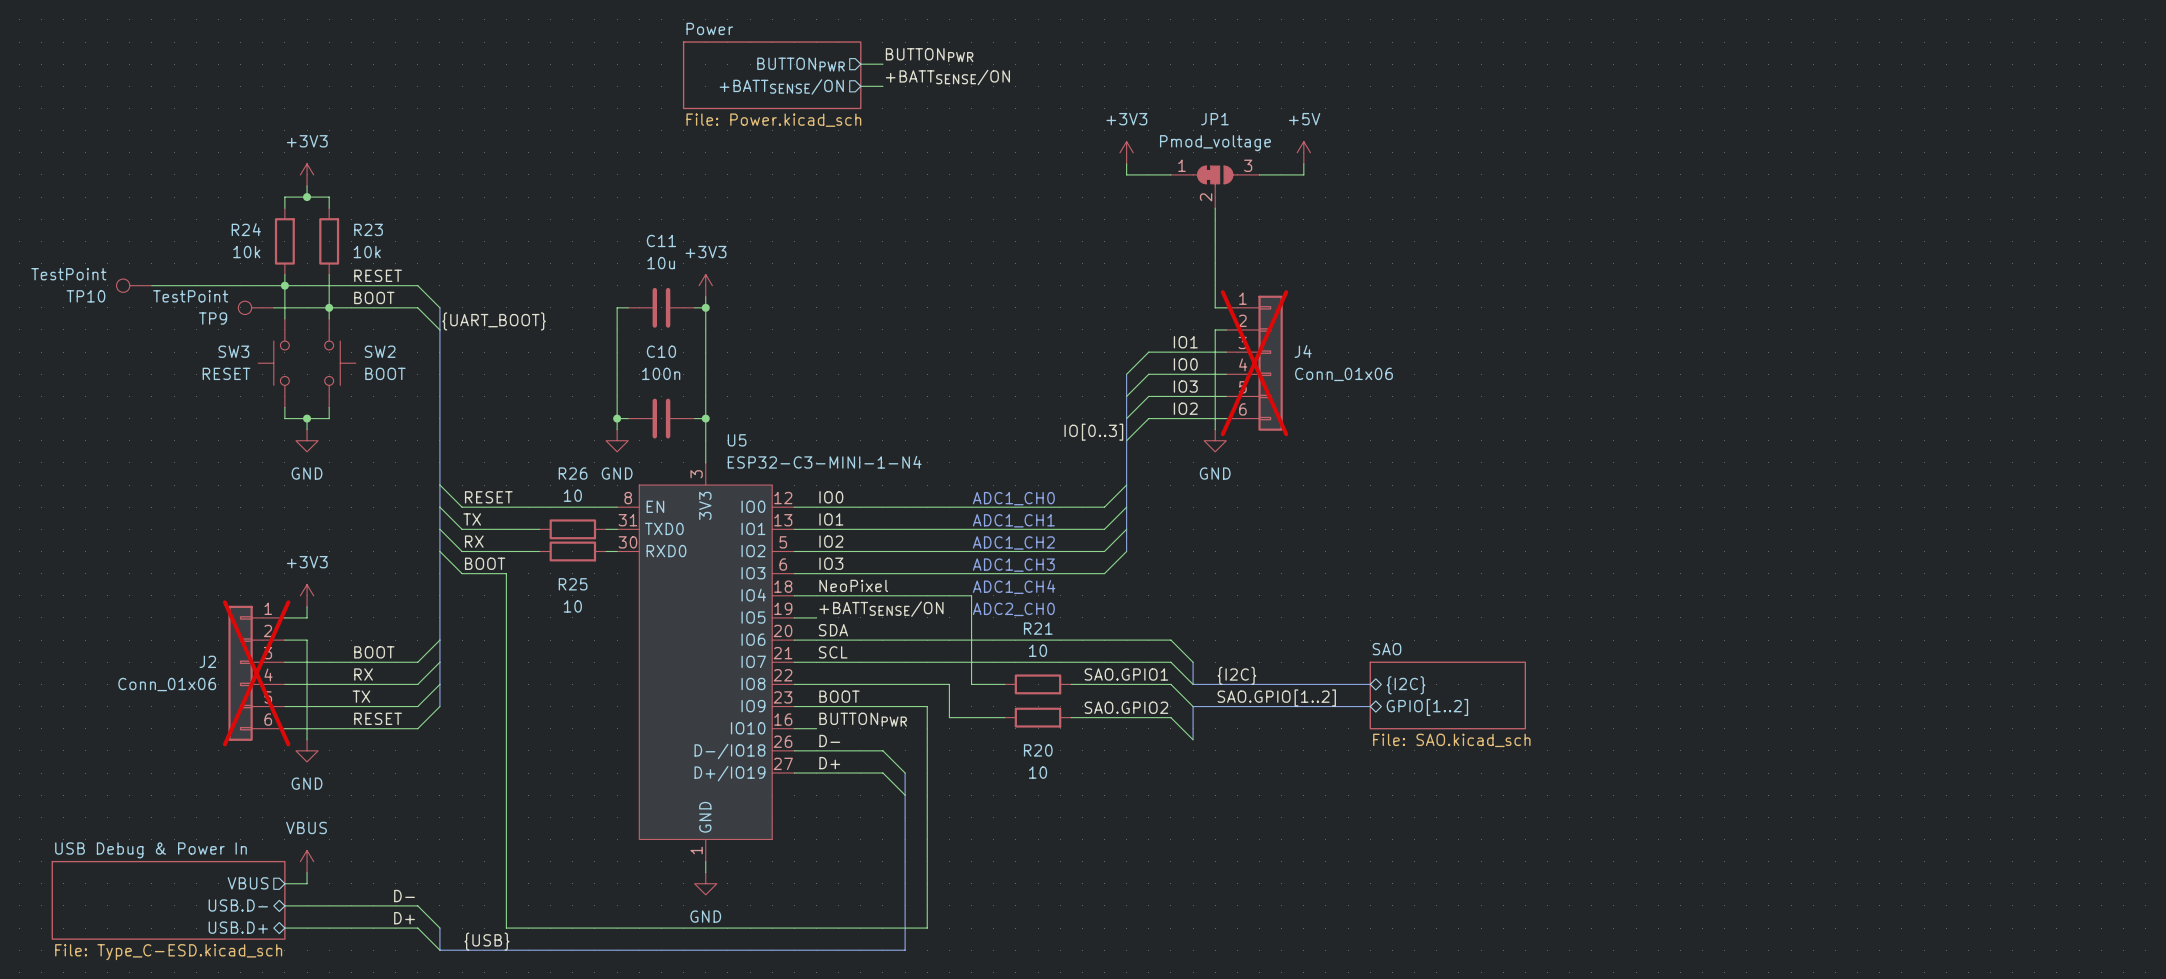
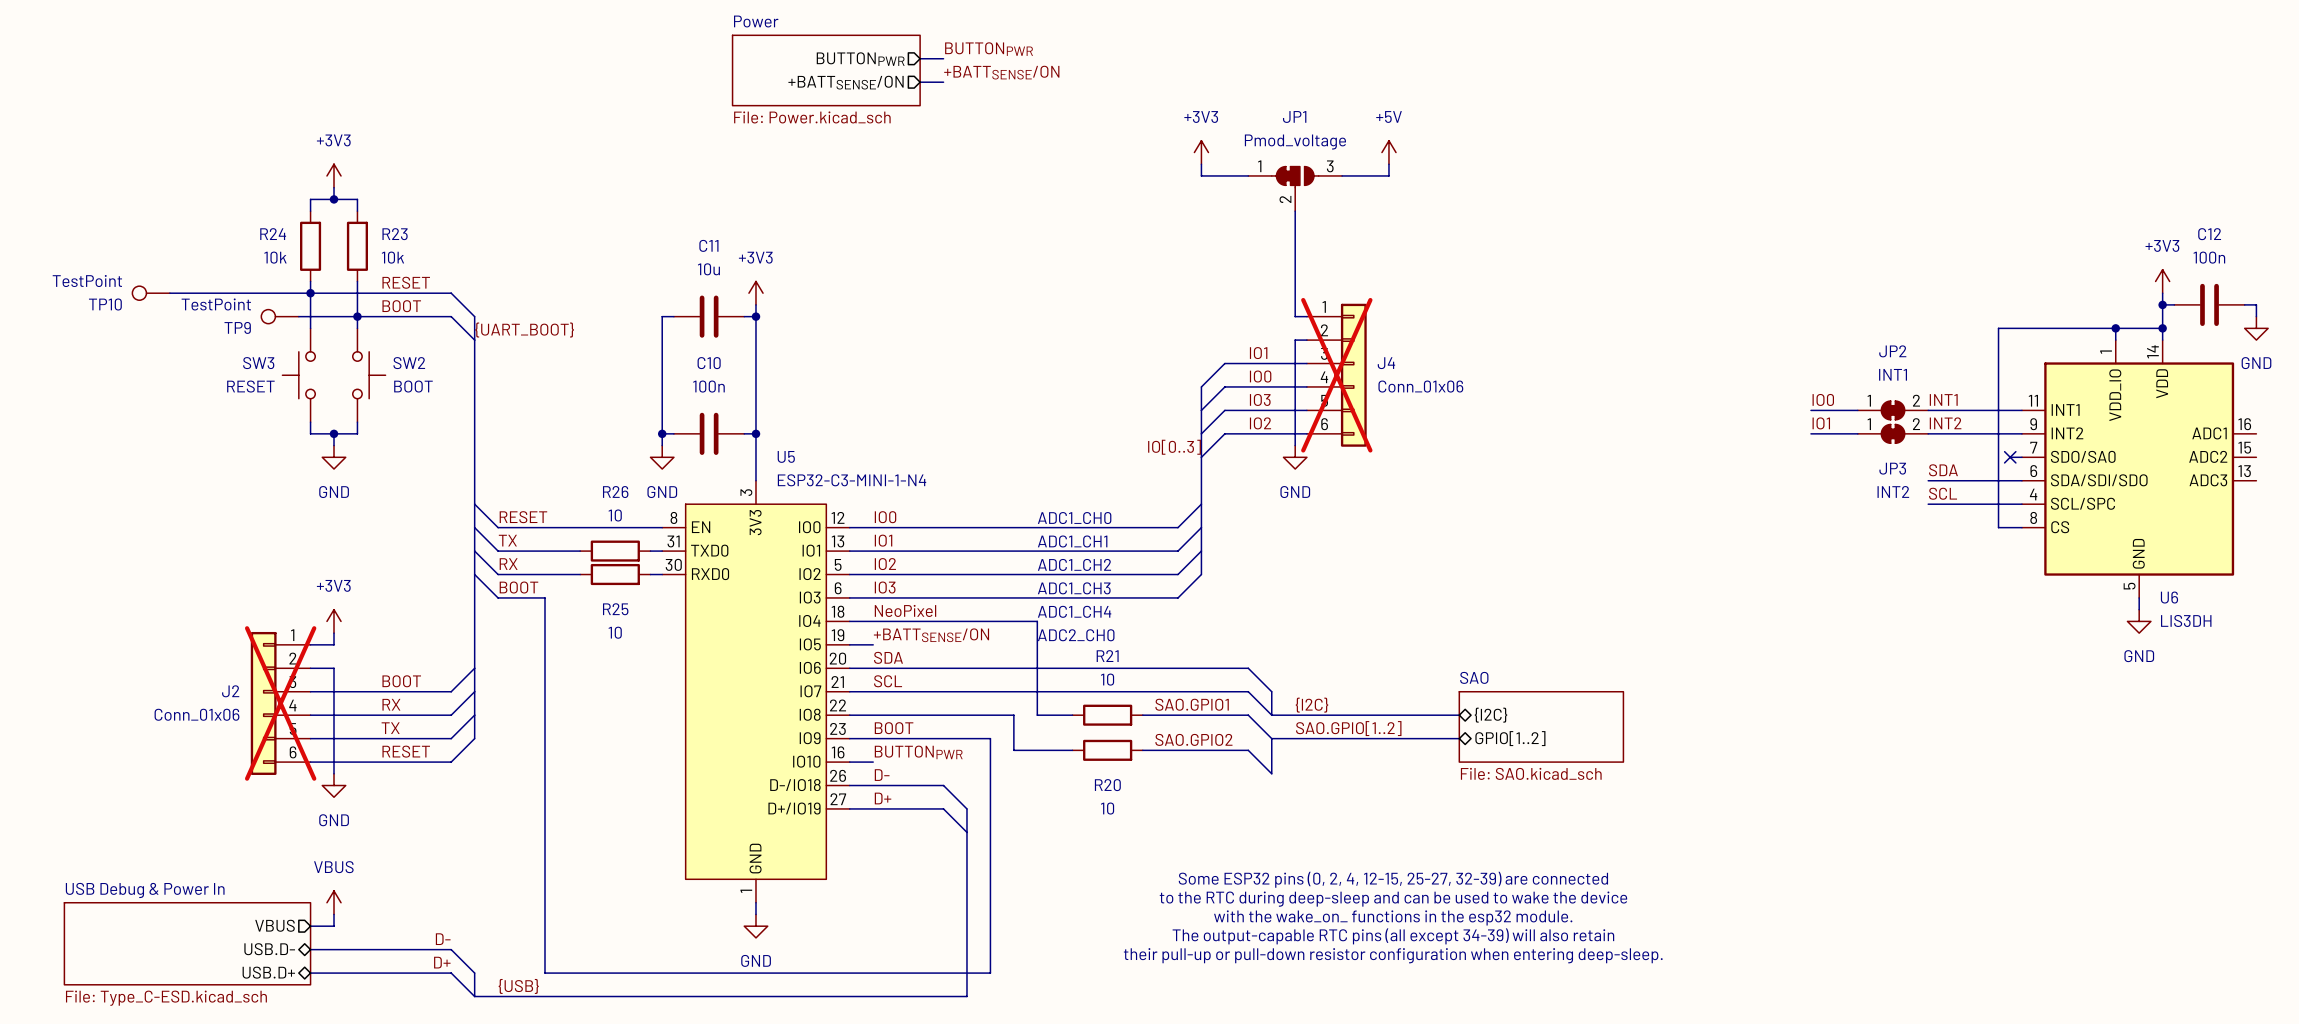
power symbol: none -> +3V3 (2162, 281)
wire: none -> (2162, 293) (2162, 340)
wire: none -> (2162, 304) (2174, 304)
junction: none -> (2162, 304)
C12: none -> 100n (2209, 304)
wire: none -> (2244, 304) (2256, 304) (2256, 316)
wire: none -> (2115, 328) (2115, 340)
junction: none -> (2115, 328)
wire: none -> (2162, 328) (1998, 328) (1998, 527) (2021, 527)
junction: none -> (2162, 328)
power symbol: none -> GND (2256, 328)
label: none -> IO0 (1823, 399)
label: none -> INT1 (1943, 399)
wire: none -> (1810, 410) (1857, 410)
JP2: none -> INT1 (1893, 410)
wire: none -> (1928, 410) (2021, 410)
label: none -> IO1 (1821, 423)
label: none -> INT2 (1945, 423)
wire: none -> (1810, 433) (1857, 433)
JP3: none -> INT2 (1893, 433)
wire: none -> (1928, 433) (2021, 433)
wire: none -> (2010, 457) (2021, 457)
no-connect mark: none -> (2010, 457)
U6: none -> LIS3DH (2139, 469)
label: none -> SDA (1943, 470)
wire: none -> (1928, 480) (2021, 480)
label: none -> SCL (1943, 493)
wire: none -> (1928, 504) (2021, 504)
wire: none -> (2139, 597) (2139, 609)
power symbol: none -> GND (2139, 621)
text: none -> Some ESP32 pins (0, 2, 4, 12-15, 25-27, 32-39) are connected (1393, 879)
text: none -> to the RTC during deep-sleep and can be used to wake the device (1393, 899)
text: none -> with the wake_on_ functions in the esp32 module. (1393, 917)
text: none -> The output-capable RTC pins (all except 34-39) will also retain (1393, 936)
text: none -> their pull-up or pull-down resistor configuration when entering deep-sleep. (1393, 955)

